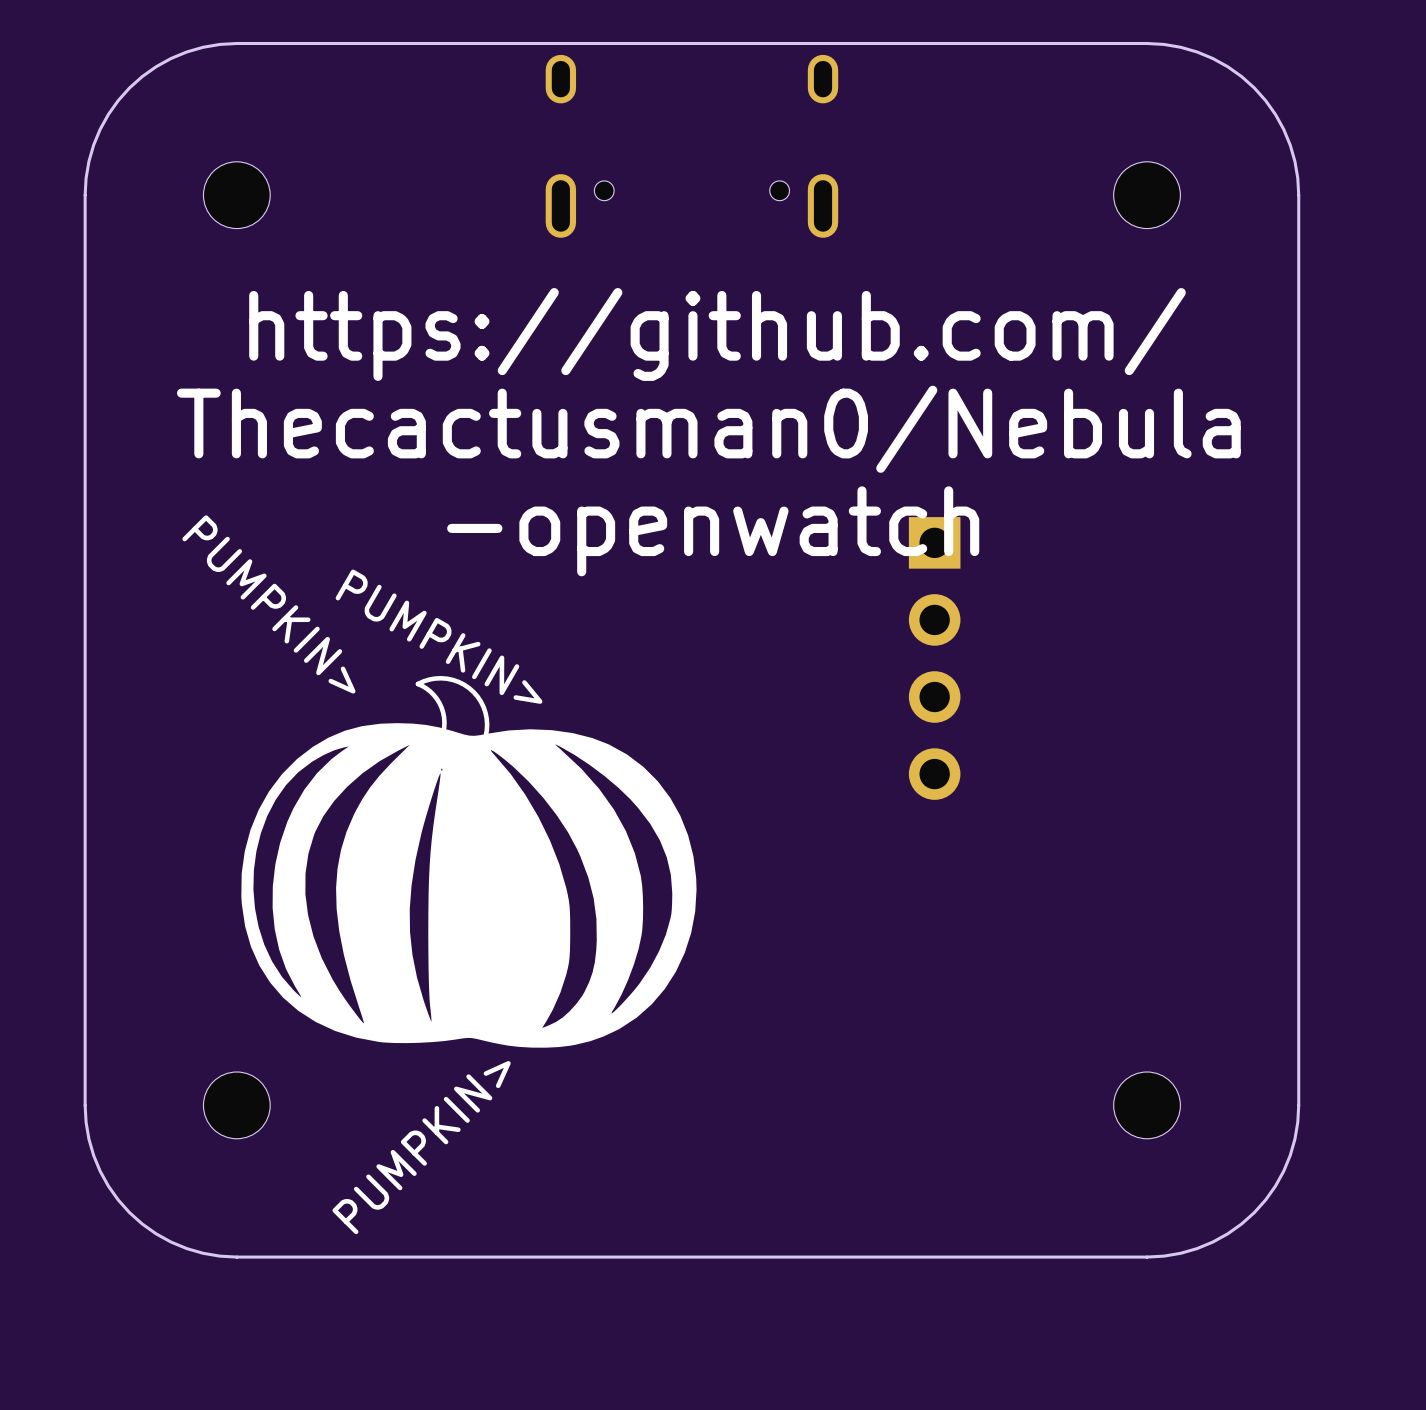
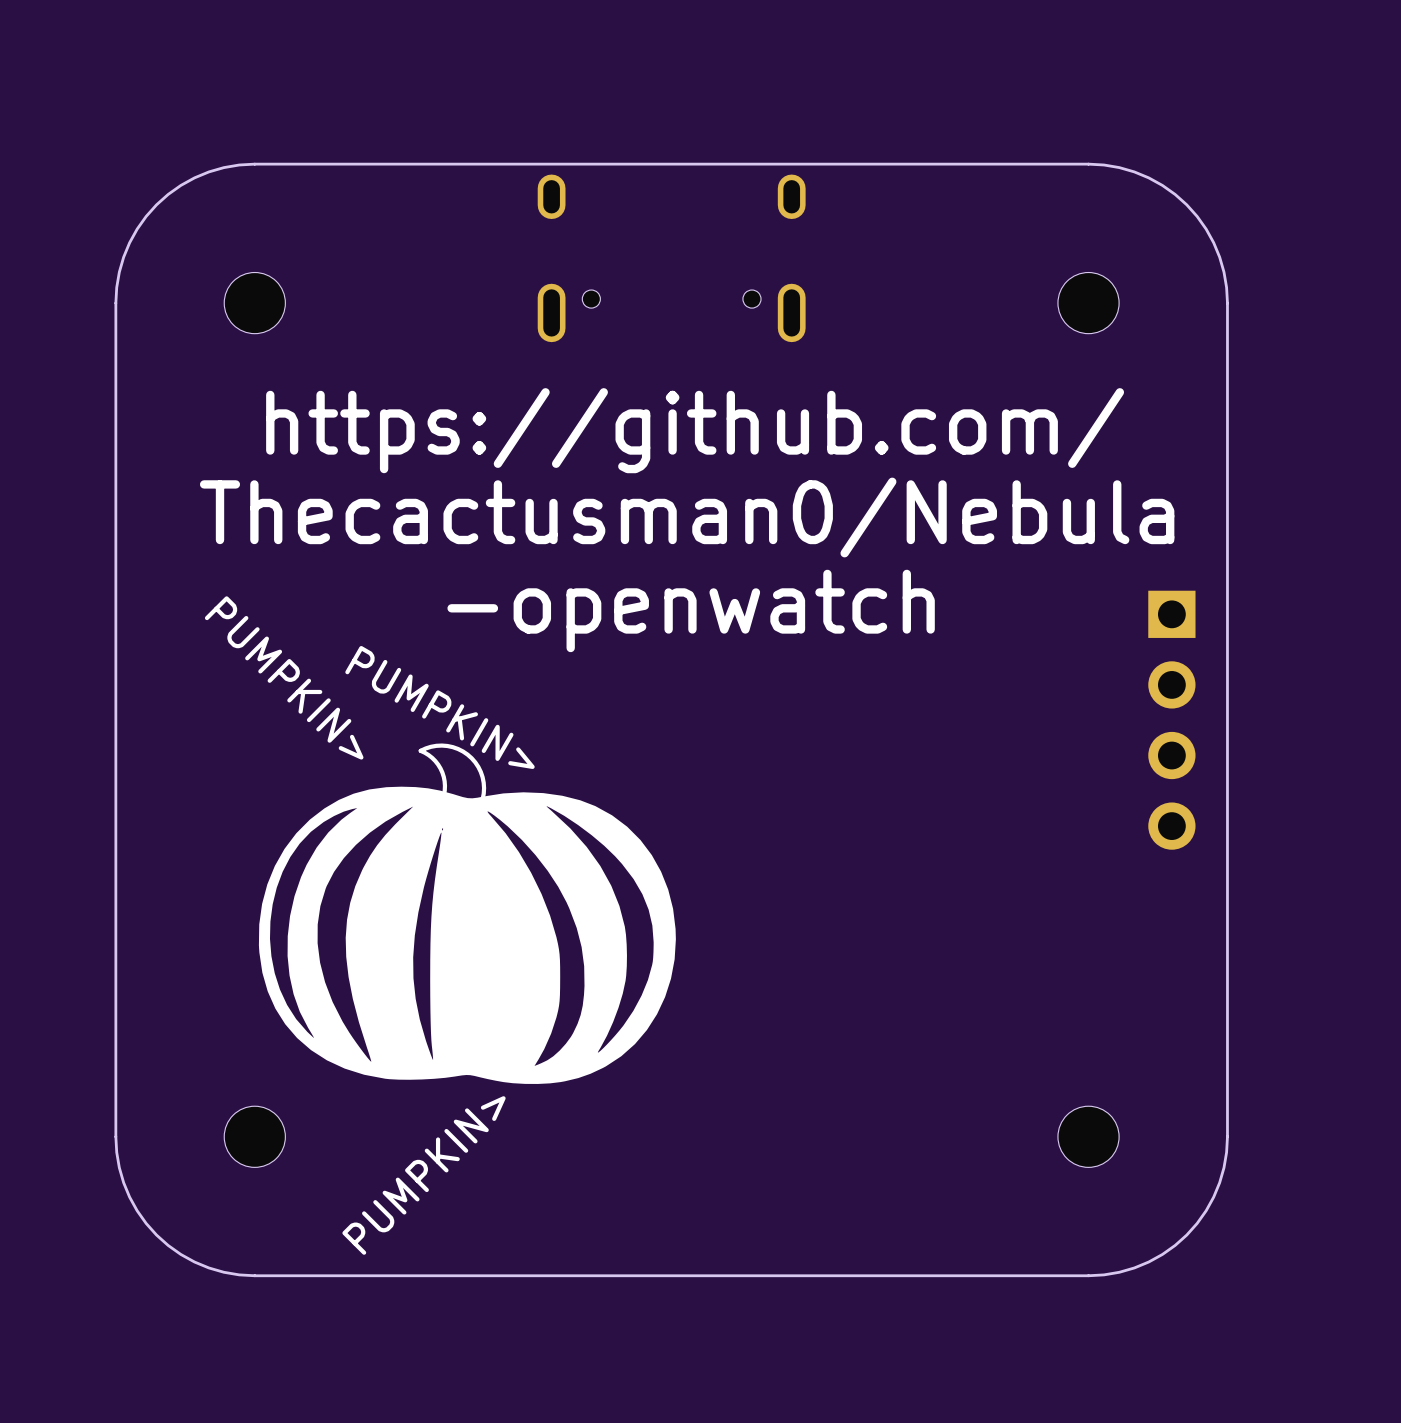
part position: (934, 658) -> (1171, 720)

